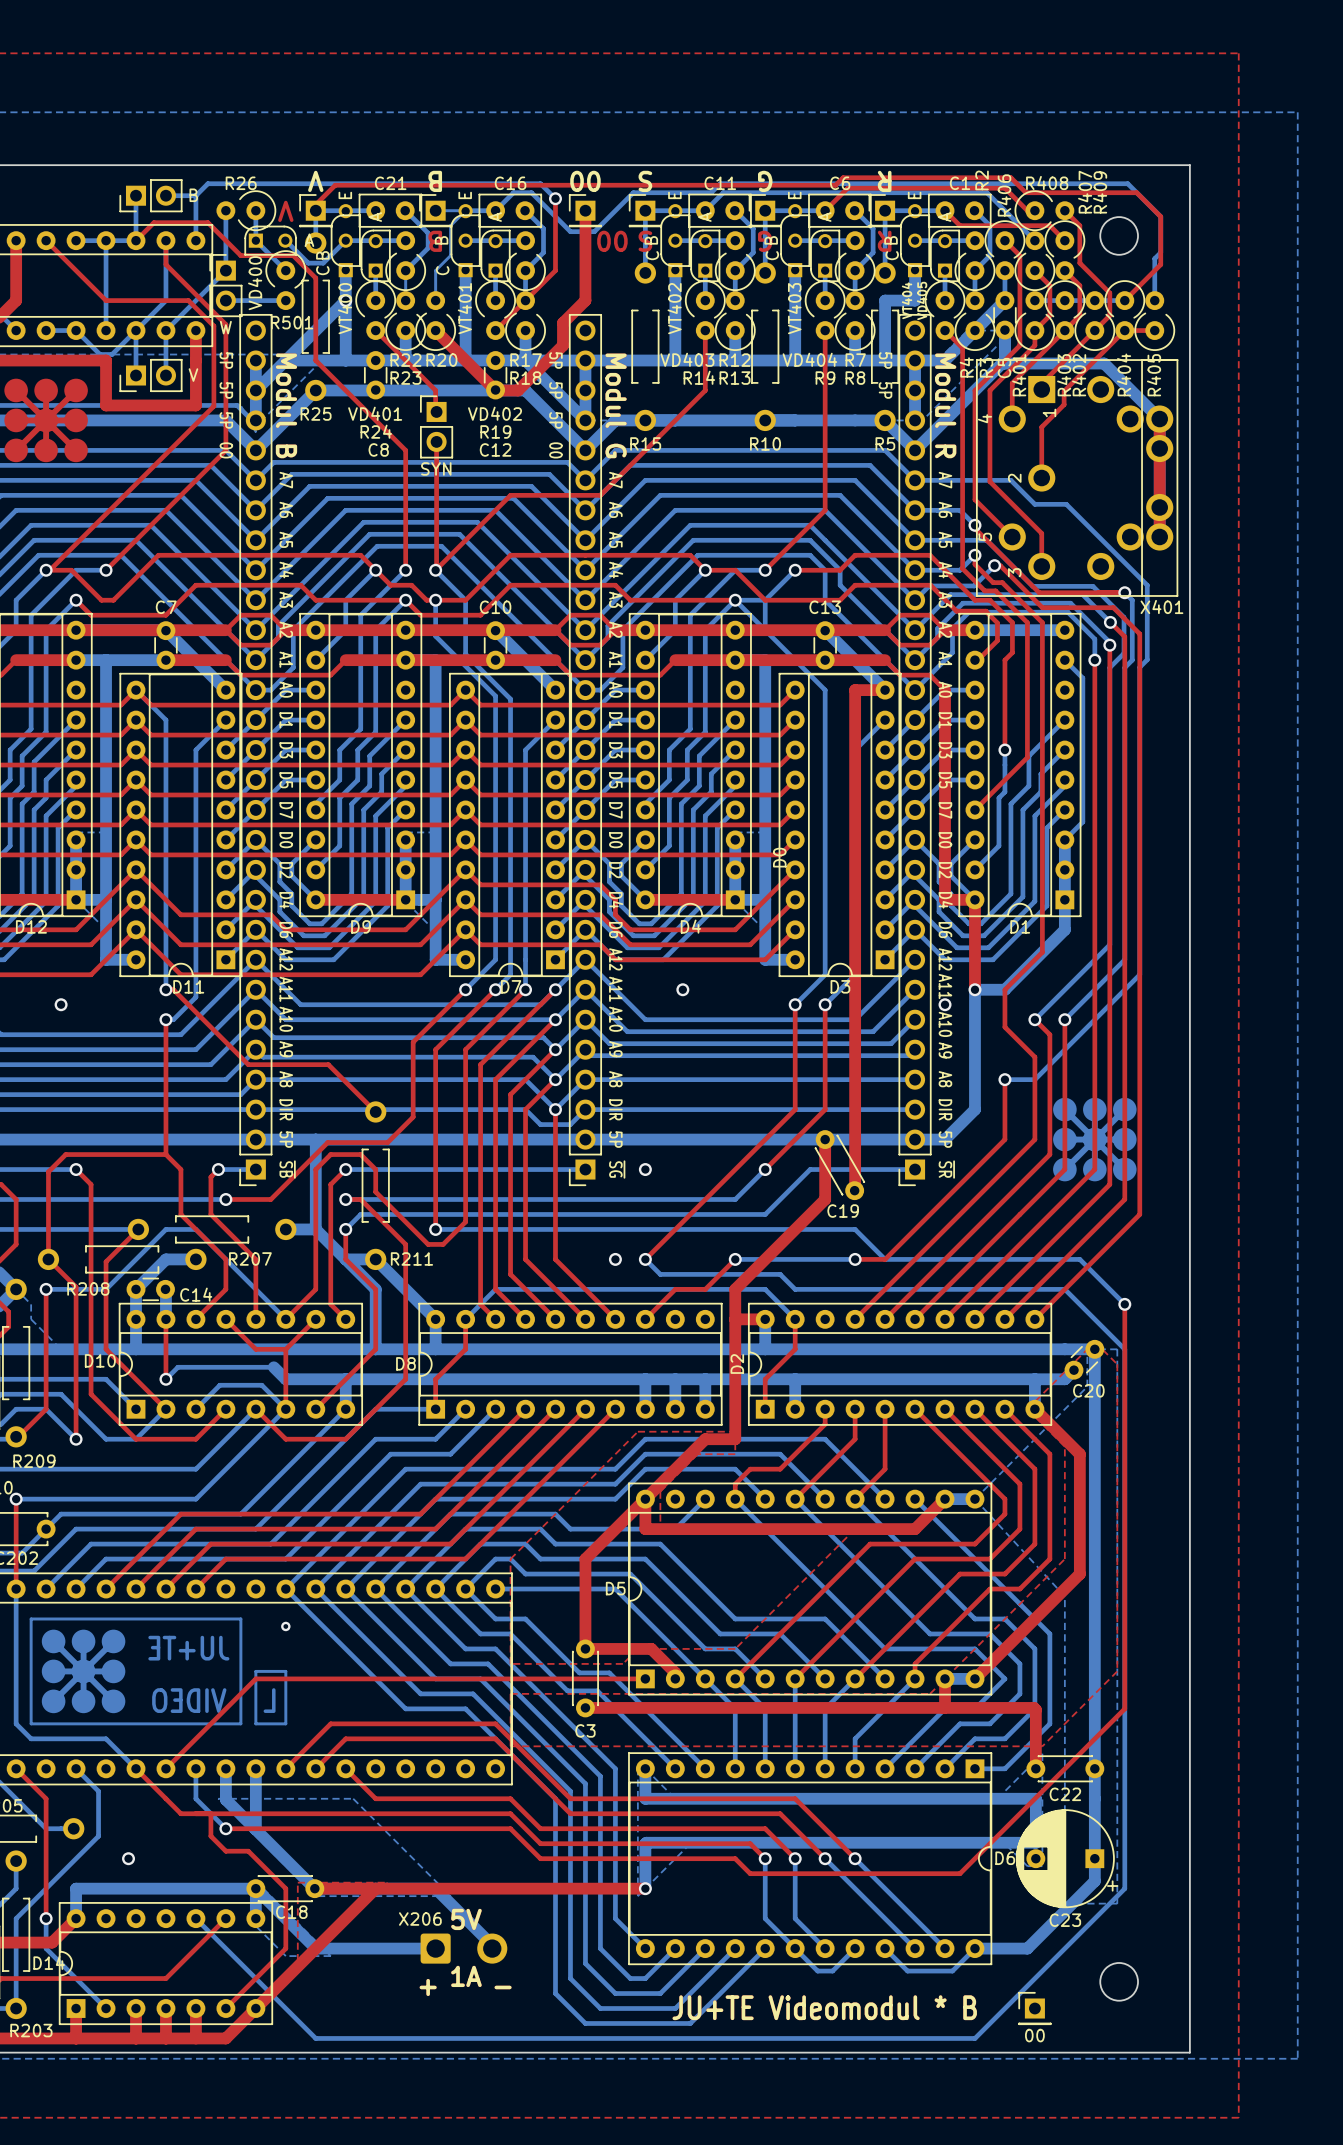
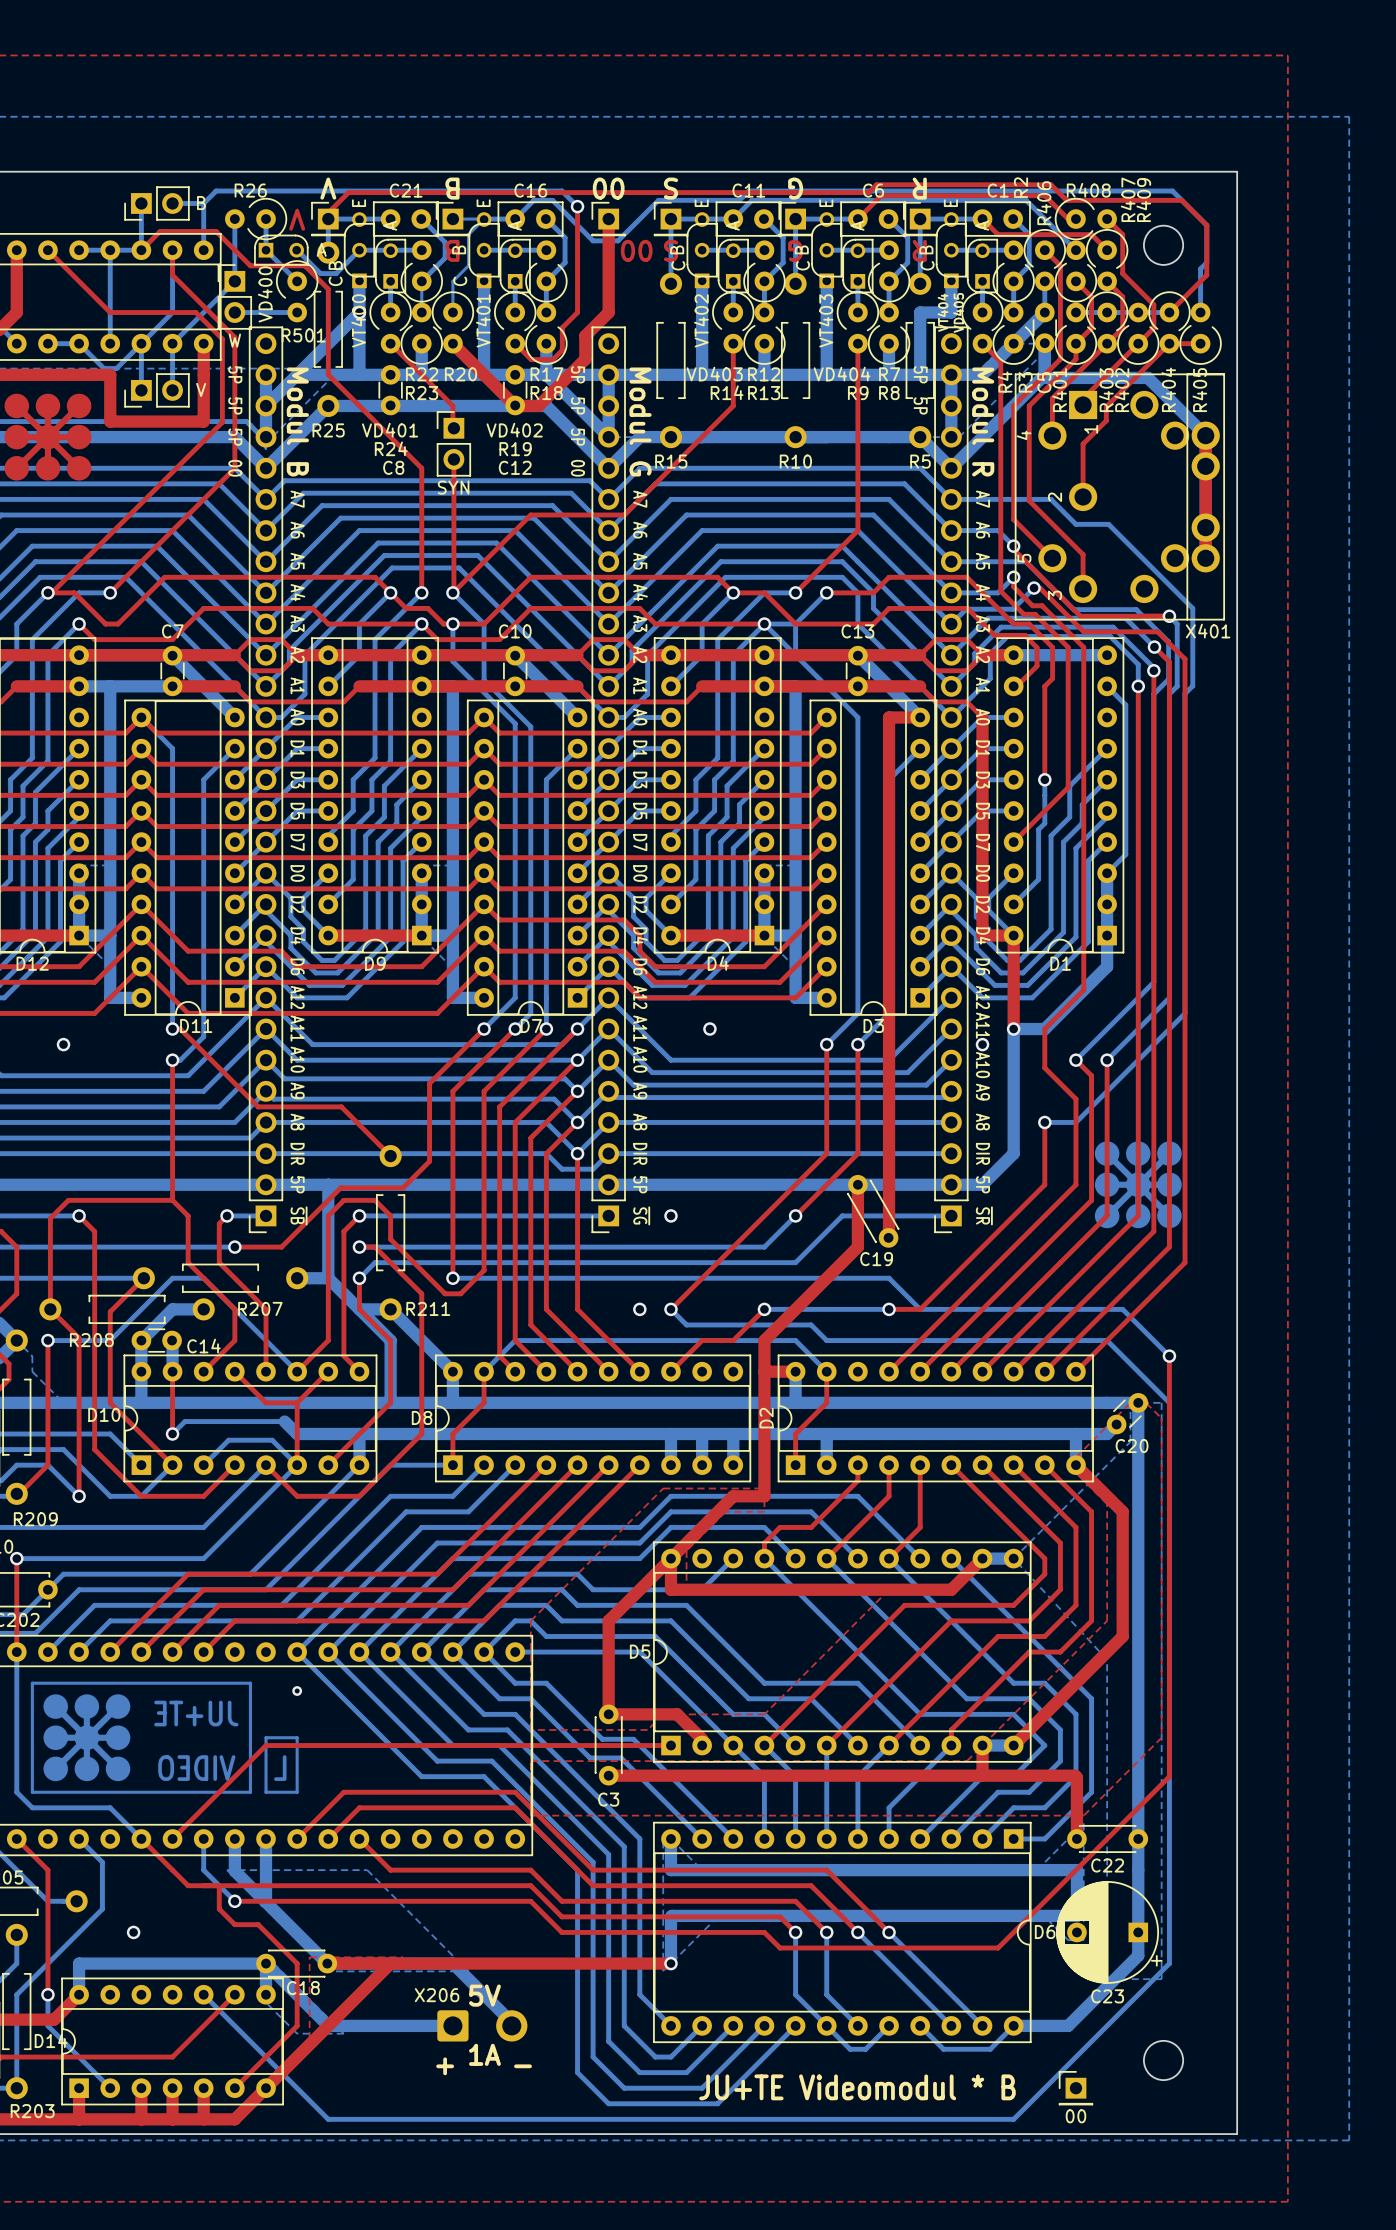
top track: (555, 270) (495, 330) -> (577, 281) (577, 312) (562, 327) (562, 350) (552, 359) (531, 359) (515, 343)
R20 rotation: 0° (435, 320) -> 180° (452, 322)
drawing: [772, 847, 787, 868] -> none

